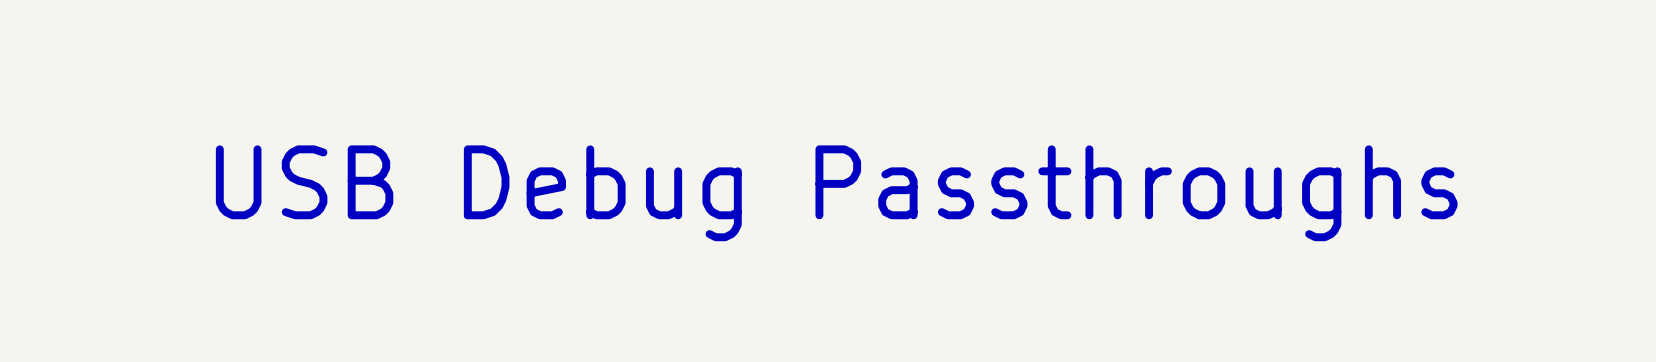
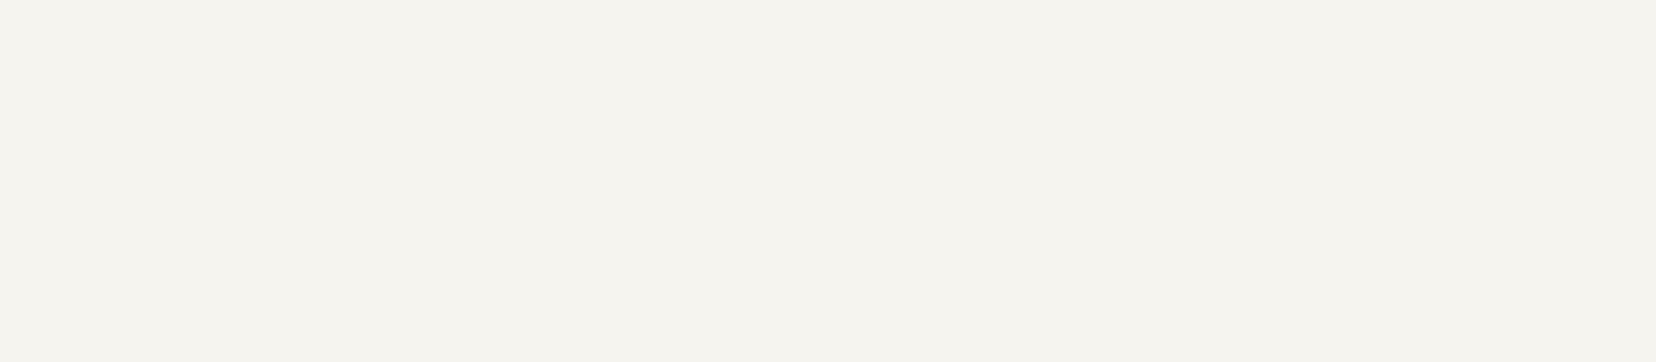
text: USB Debug Passthroughs (836, 193) -> none

